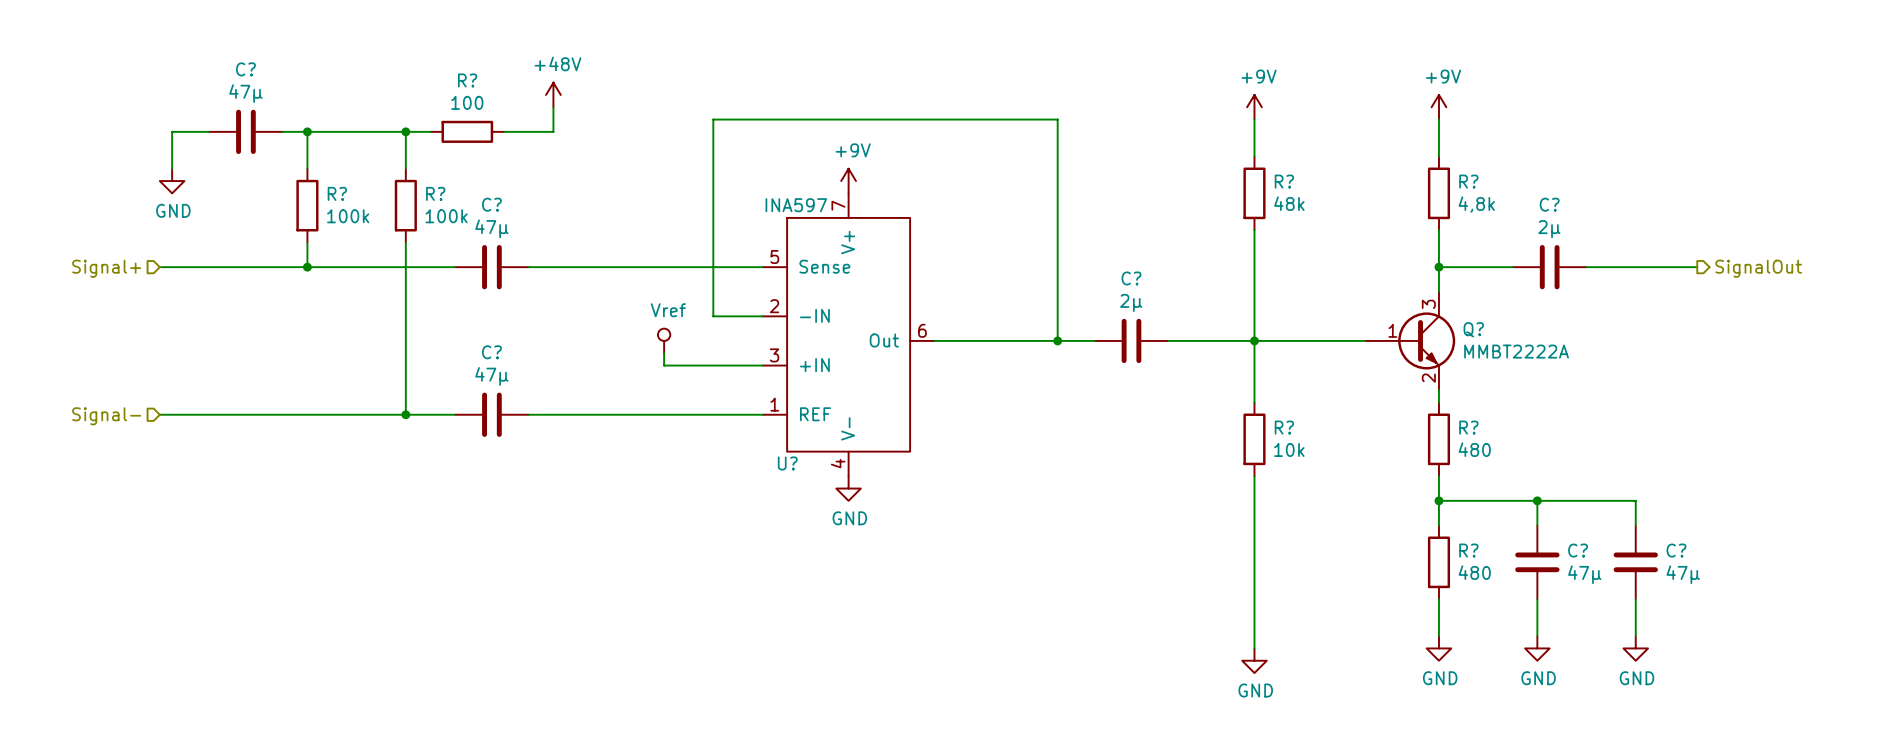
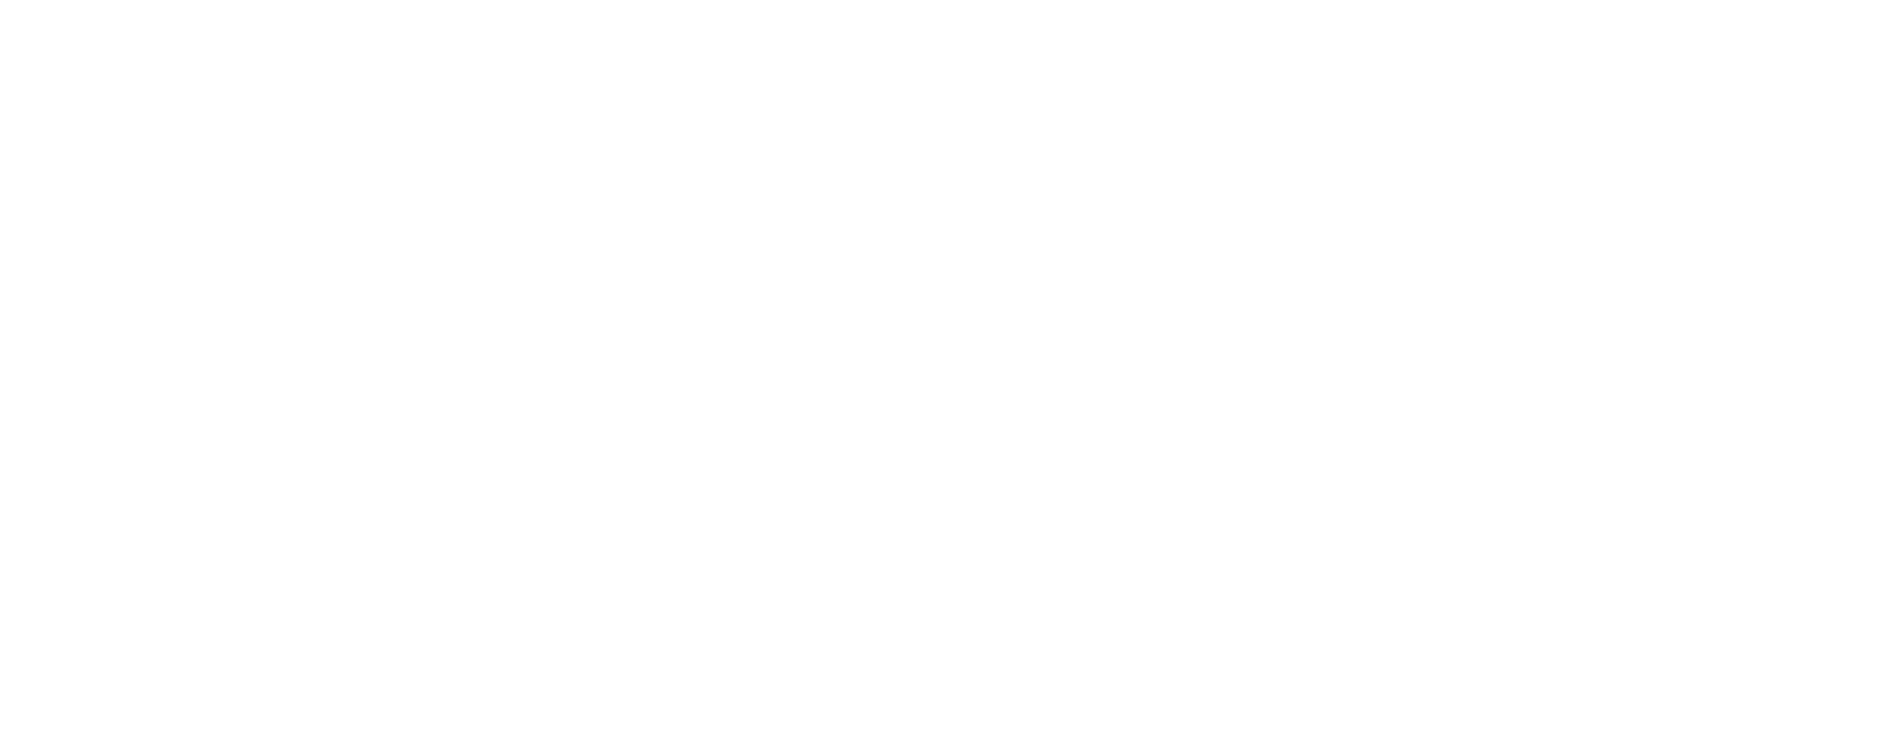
power symbol: +48V (553, 94) -> none
wire: (553, 107) (553, 131) (504, 131) -> none
power symbol: +9V (1254, 107) -> none
power symbol: +9V (1438, 107) -> none
wire: (1254, 119) (1254, 156) -> none
wire: (1438, 119) (1438, 156) -> none
wire: (209, 131) (172, 131) (172, 168) -> none
C?: 47µ (245, 131) -> none
wire: (282, 131) (430, 131) -> none
wire: (307, 131) (307, 168) -> none
junction: (307, 131) -> none
wire: (405, 131) (405, 168) -> none
junction: (405, 131) -> none
R?: 100 (467, 131) -> none
power symbol: GND (172, 181) -> none
power symbol: +9V (848, 181) -> none
R?: 48k (1254, 193) -> none
R?: 4,8k (1438, 193) -> none
R?: 100k (307, 205) -> none
R?: 100k (405, 205) -> none
wire: (1254, 230) (1254, 402) -> none
wire: (1438, 230) (1438, 291) -> none
wire: (307, 242) (307, 267) -> none
wire: (405, 242) (405, 414) -> none
wire: (159, 267) (455, 267) -> none
junction: (307, 267) -> none
C?: 47µ (491, 267) -> none
wire: (528, 267) (762, 267) -> none
wire: (1438, 267) (1512, 267) -> none
junction: (1438, 267) -> none
C?: 2µ (1549, 267) -> none
wire: (1586, 267) (1697, 267) -> none
hierarchical label: Signal+ (106, 268) -> none
hierarchical label: SignalOut (1758, 268) -> none
wire: (762, 316) (713, 316) (713, 119) (1057, 119) (1057, 340) -> none
U?: INA597 (848, 334) -> none
power symbol: Vref (664, 340) -> none
wire: (934, 340) (1094, 340) -> none
junction: (1057, 340) -> none
C?: 2µ (1131, 340) -> none
wire: (1168, 340) (1365, 340) -> none
junction: (1254, 340) -> none
Q?: MMBT2222A (1410, 340) -> none
wire: (664, 353) (664, 365) (762, 365) -> none
wire: (1438, 390) (1438, 402) -> none
wire: (159, 414) (455, 414) -> none
junction: (405, 414) -> none
C?: 47µ (491, 414) -> none
wire: (528, 414) (762, 414) -> none
hierarchical label: Signal- (106, 416) -> none
R?: 10k (1254, 439) -> none
R?: 480 (1438, 439) -> none
wire: (1254, 476) (1254, 648) -> none
wire: (1438, 476) (1438, 525) -> none
power symbol: GND (848, 488) -> none
wire: (1438, 500) (1635, 500) (1635, 525) -> none
junction: (1438, 500) -> none
wire: (1537, 500) (1537, 525) -> none
junction: (1537, 500) -> none
R?: 480 (1438, 562) -> none
C?: 47µ (1537, 562) -> none
C?: 47µ (1635, 562) -> none
wire: (1438, 599) (1438, 636) -> none
wire: (1537, 599) (1537, 636) -> none
wire: (1635, 599) (1635, 636) -> none
power symbol: GND (1438, 648) -> none
power symbol: GND (1537, 648) -> none
power symbol: GND (1635, 648) -> none
power symbol: GND (1254, 660) -> none

